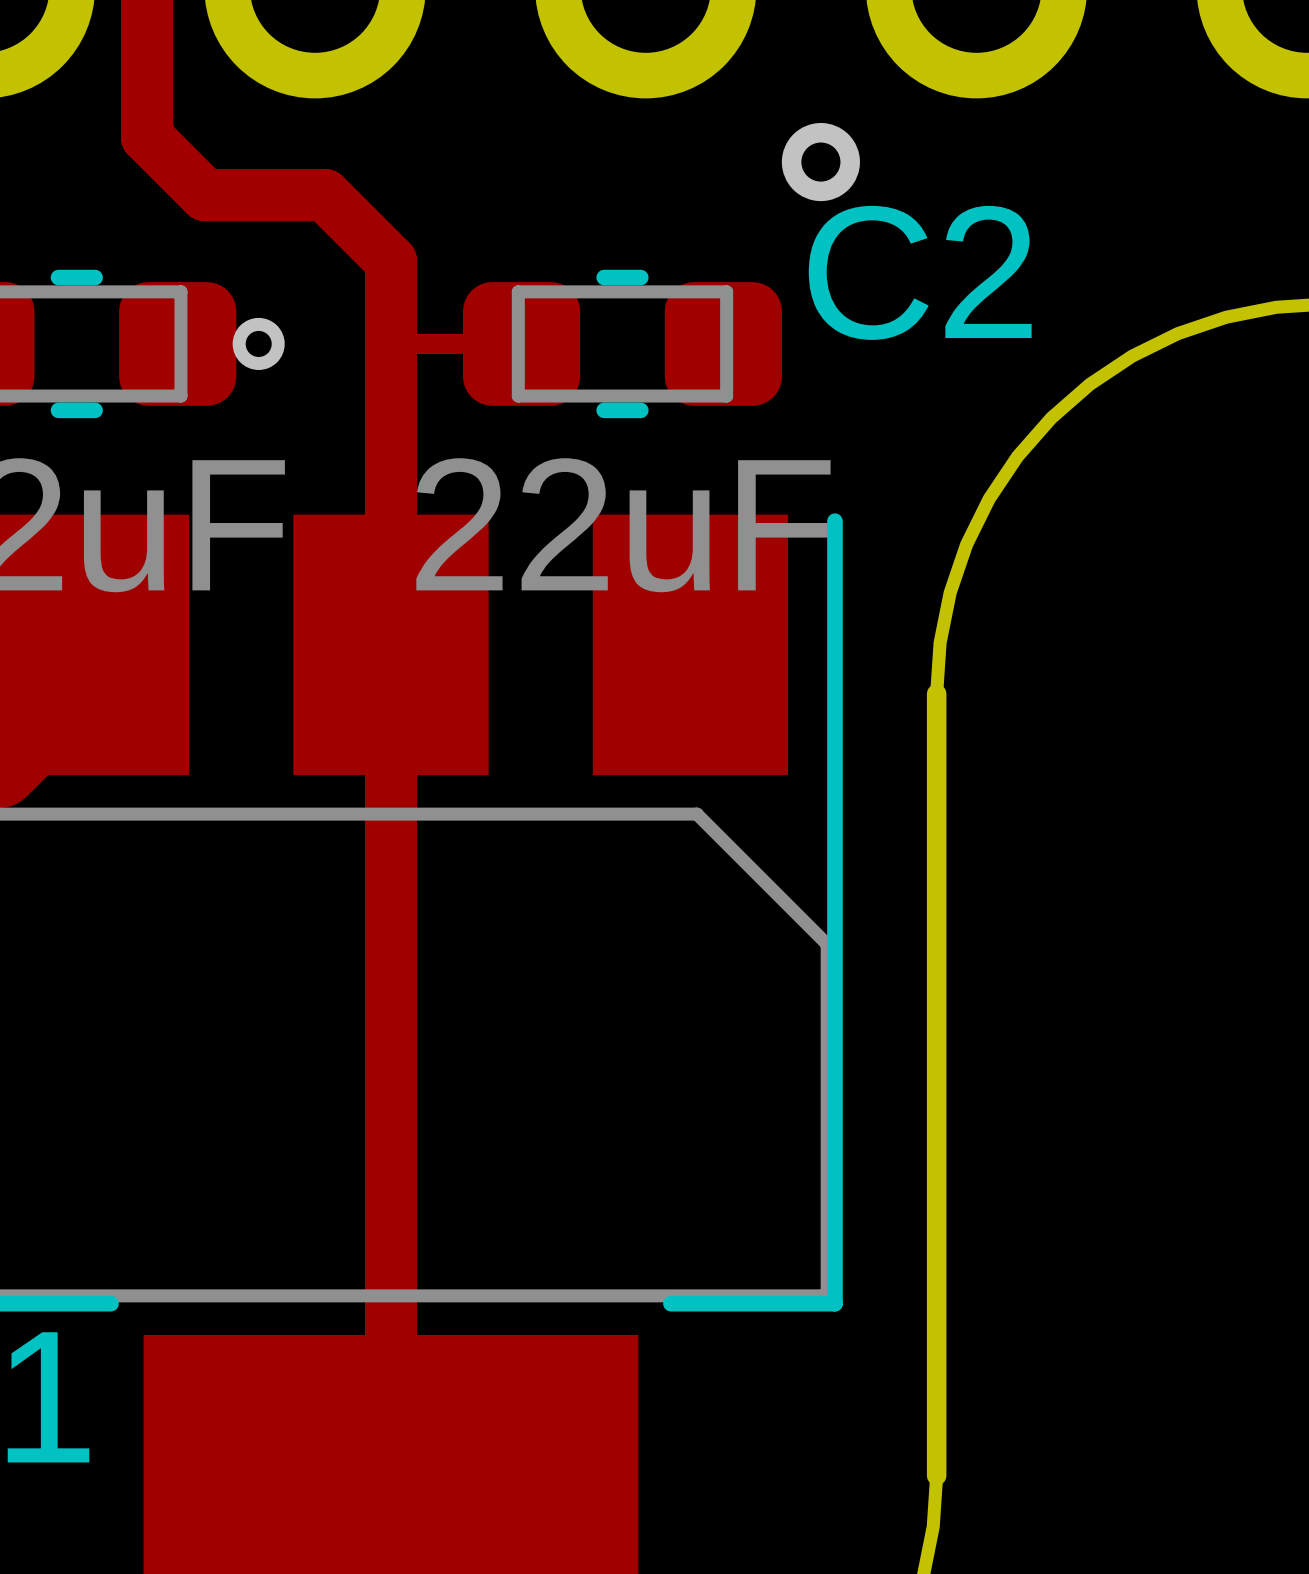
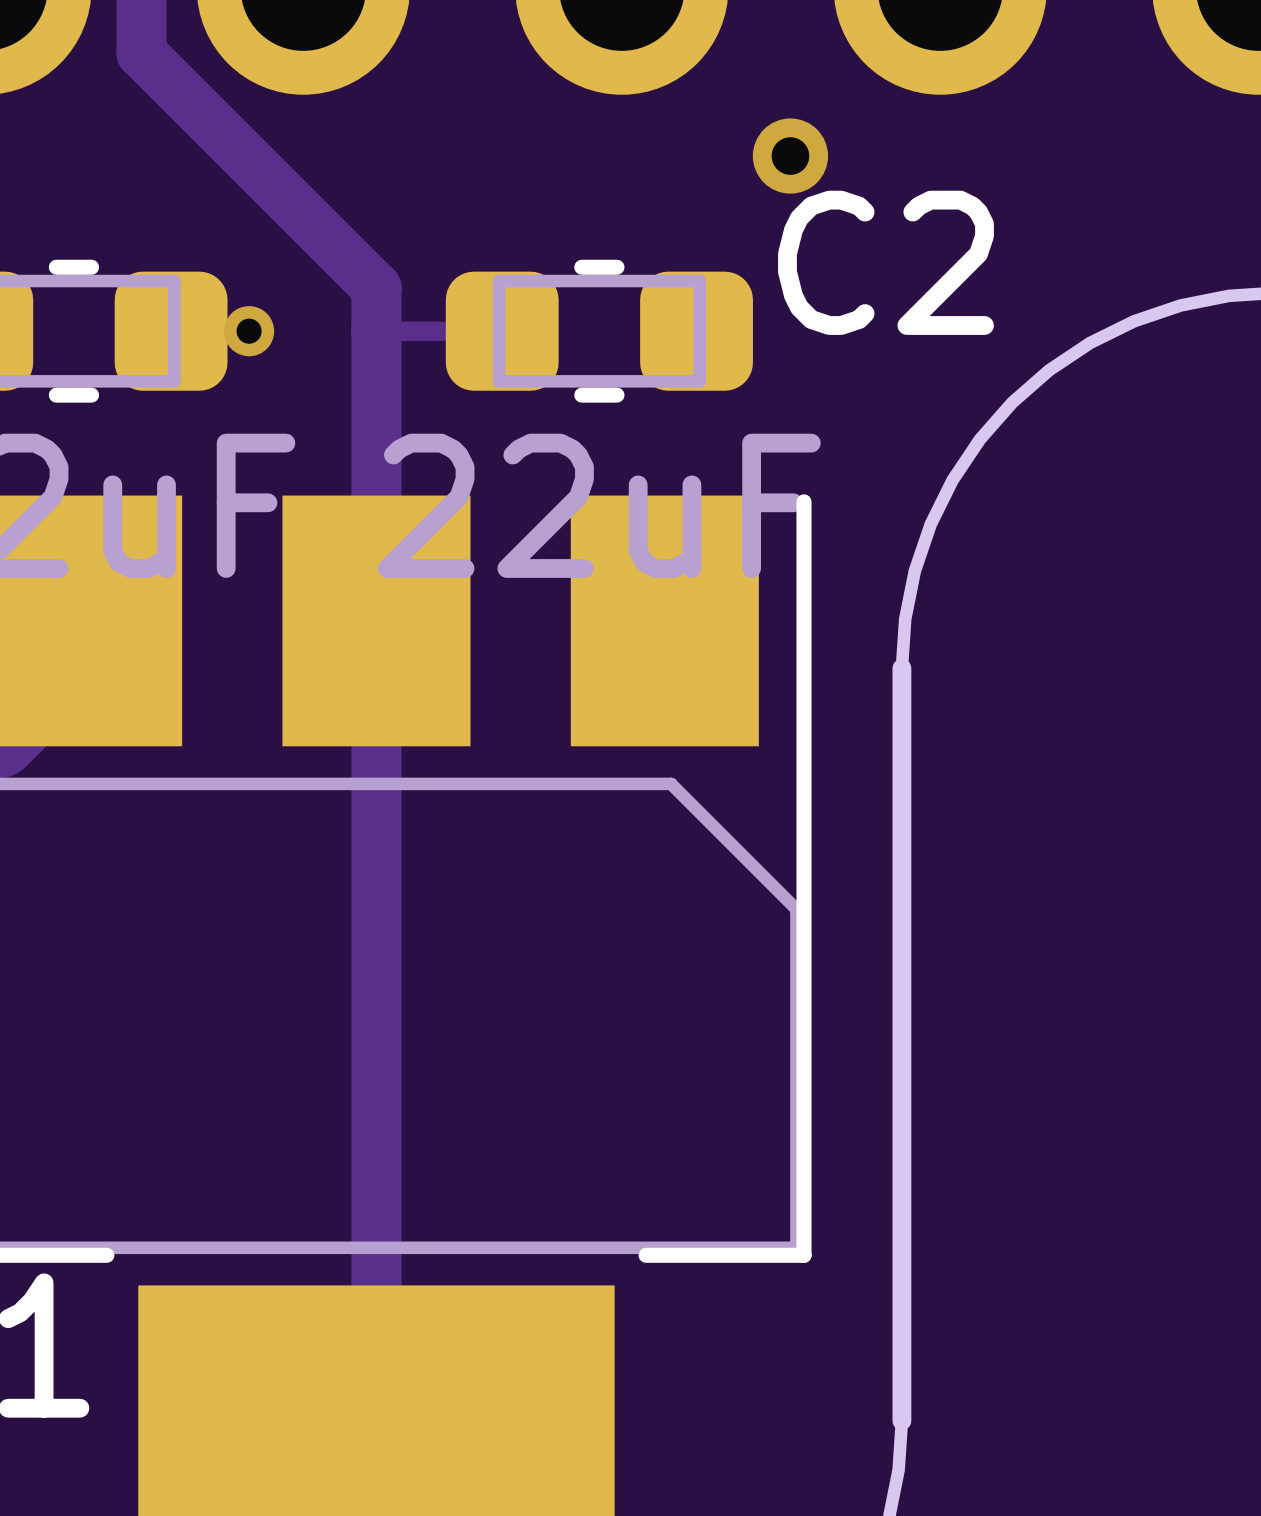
track: (147, 55) (147, 136) (205, 195) (324, 195) (390, 261) (390, 299) -> (141, 53) (376, 287)

